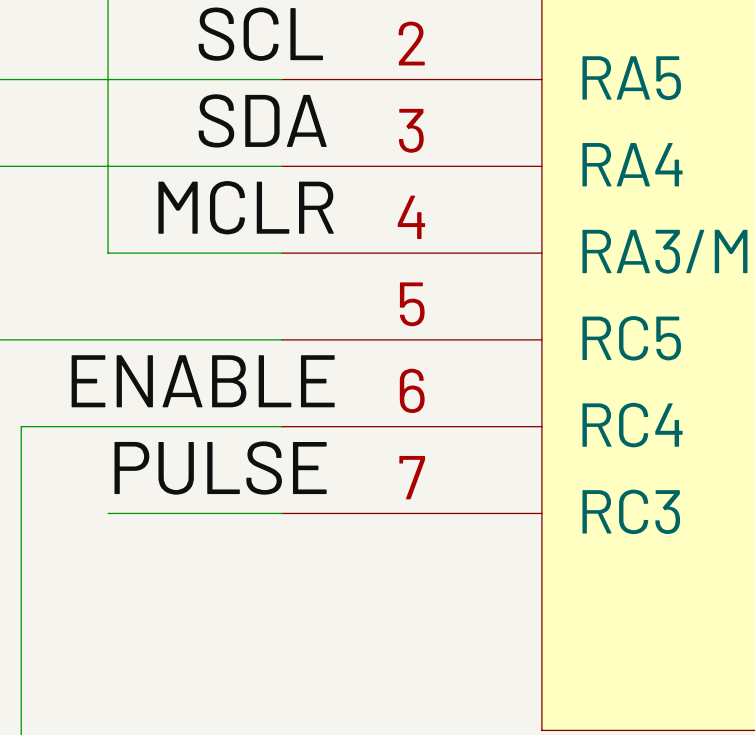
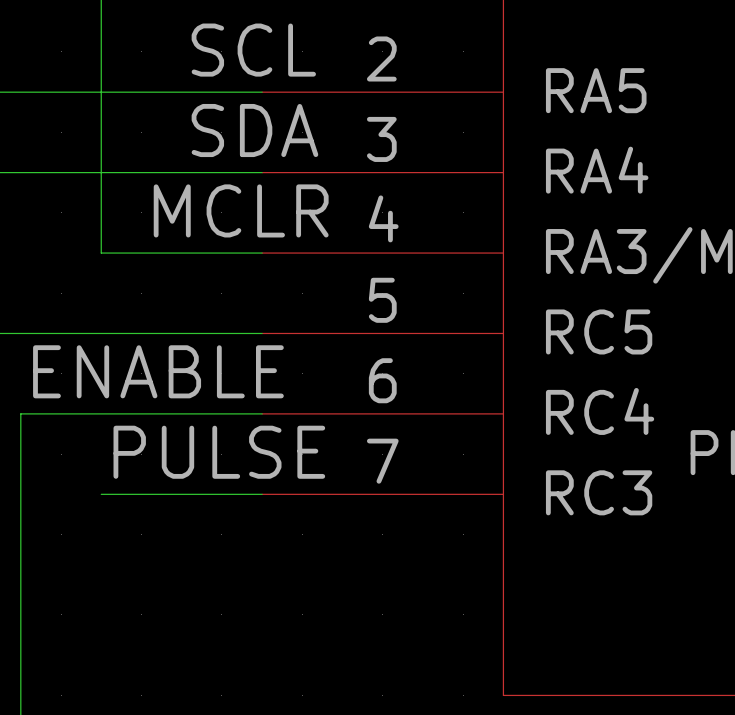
label position: ENABLE (203, 381) -> ENABLE (158, 371)

